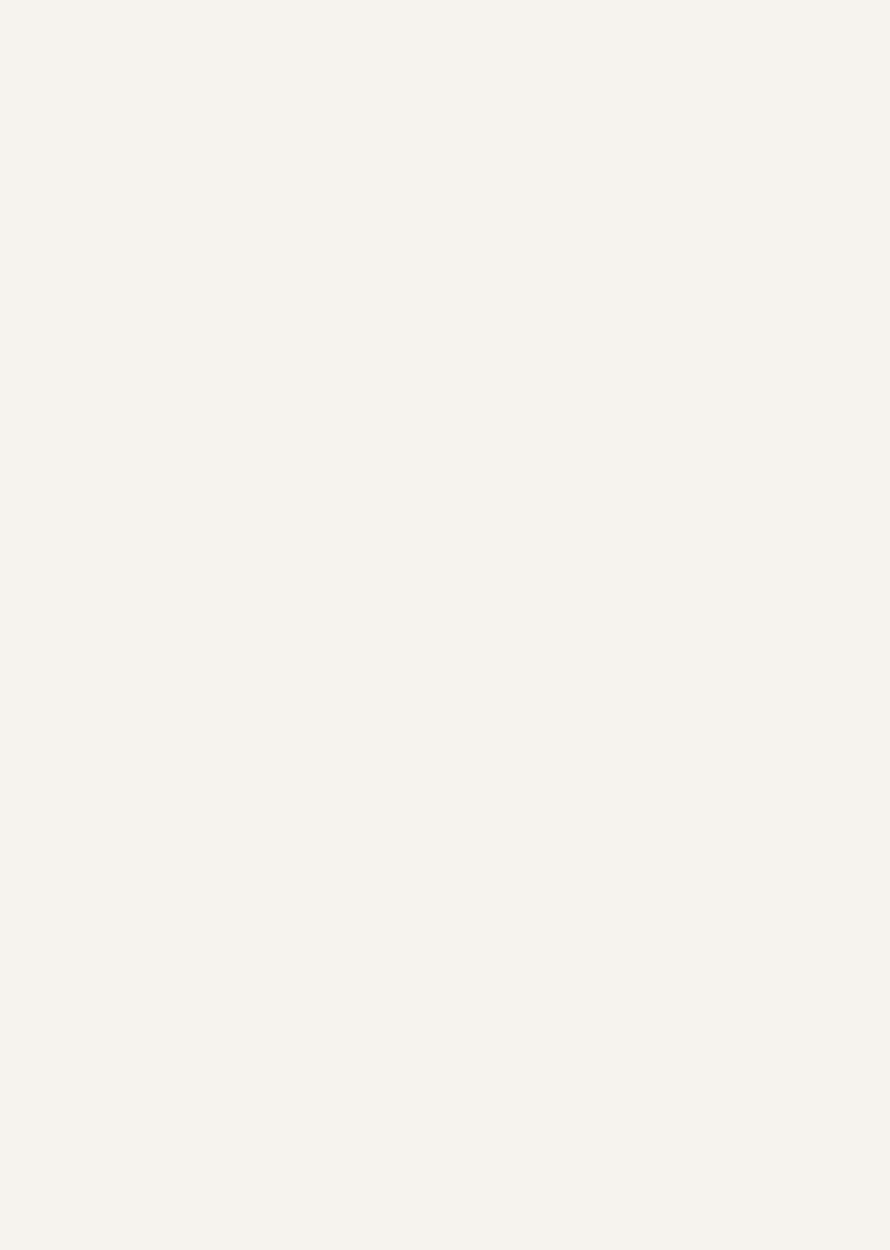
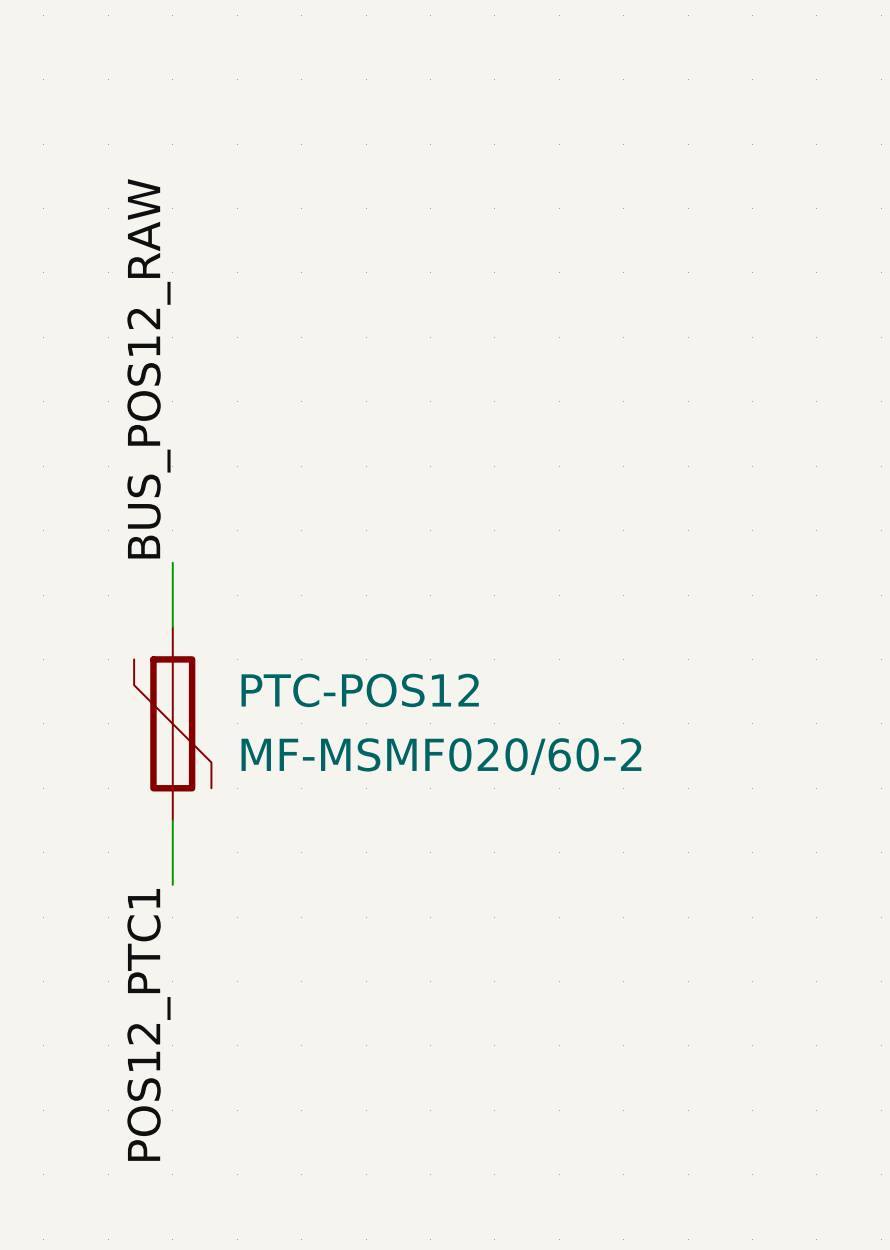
label: none -> BUS_POS12_RAW (148, 368)
wire: none -> (172, 562) (172, 627)
PTC-POS12: none -> MF-MSMF020/60-2 (172, 723)
wire: none -> (172, 820) (172, 884)
label: none -> POS12_PTC1 (148, 1024)

